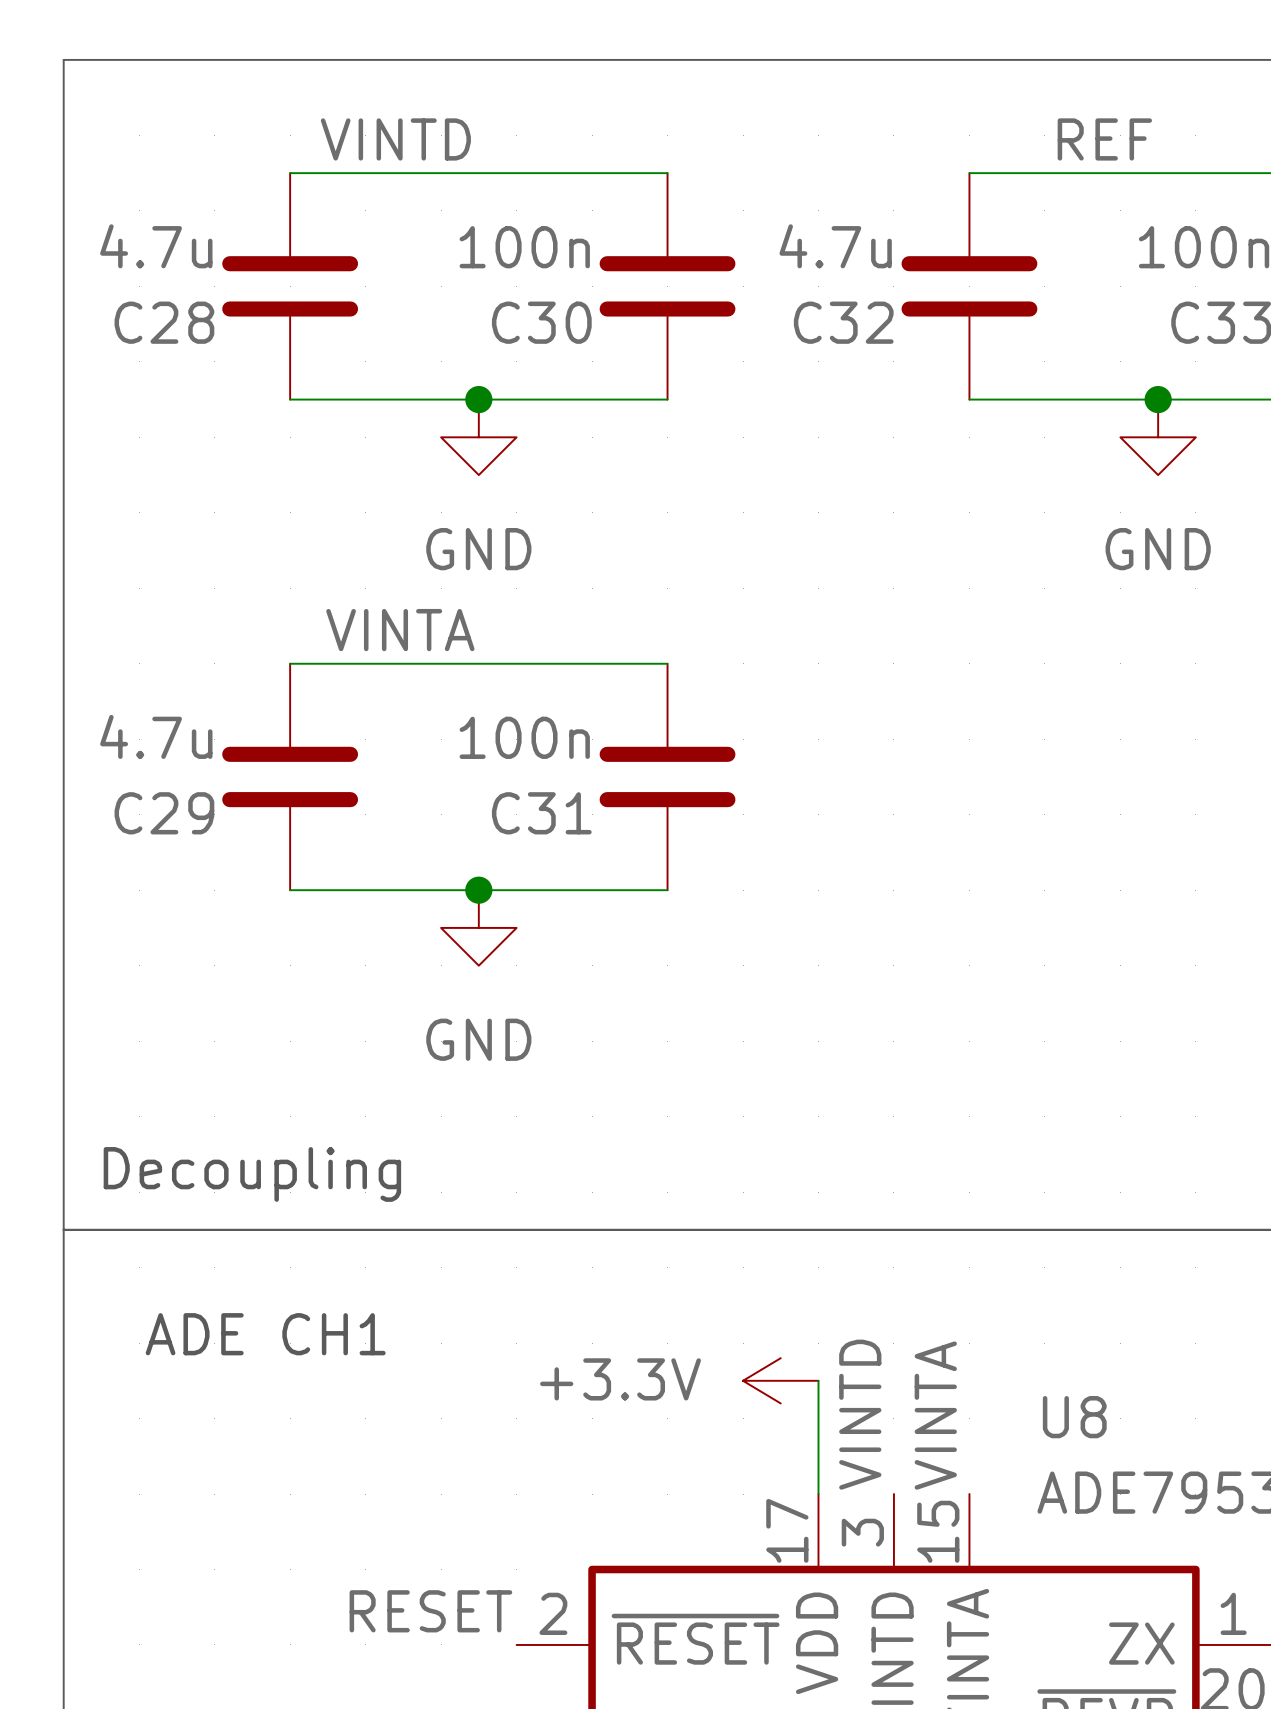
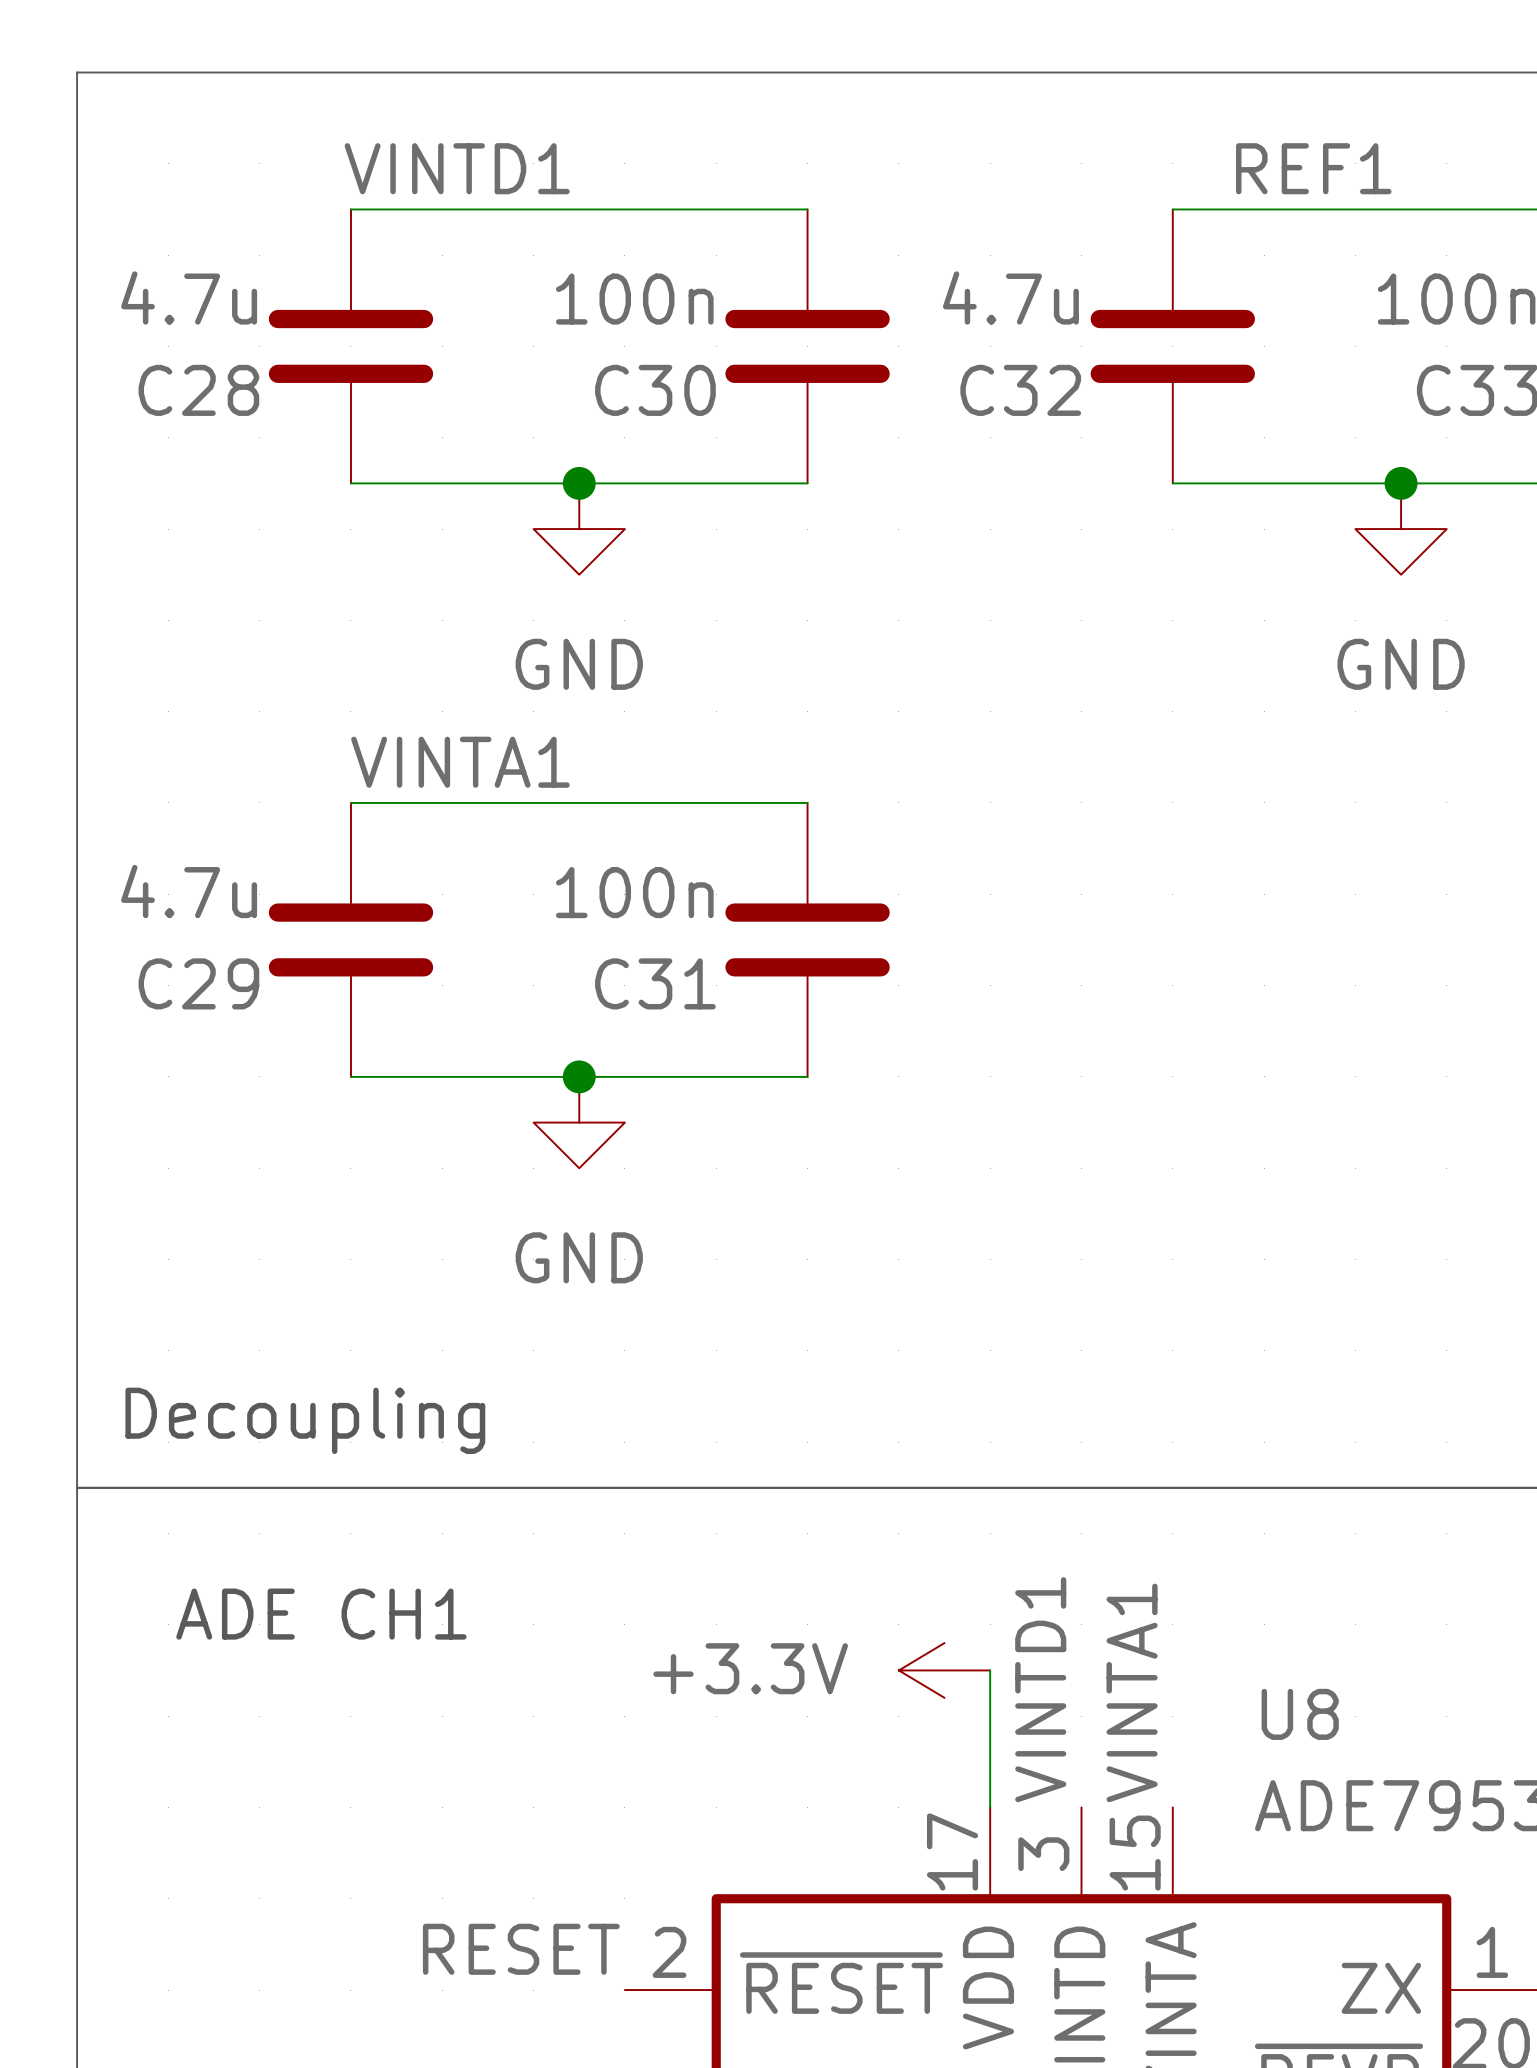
label: VINTD (395, 139) -> VINTD1 (457, 168)
label: REF (1104, 139) -> REF1 (1313, 168)
label: VINTA (400, 630) -> VINTA1 (460, 762)
label: VINTD (860, 1414) -> VINTD1 (1040, 1689)
label: VINTA (935, 1415) -> VINTA1 (1132, 1692)

